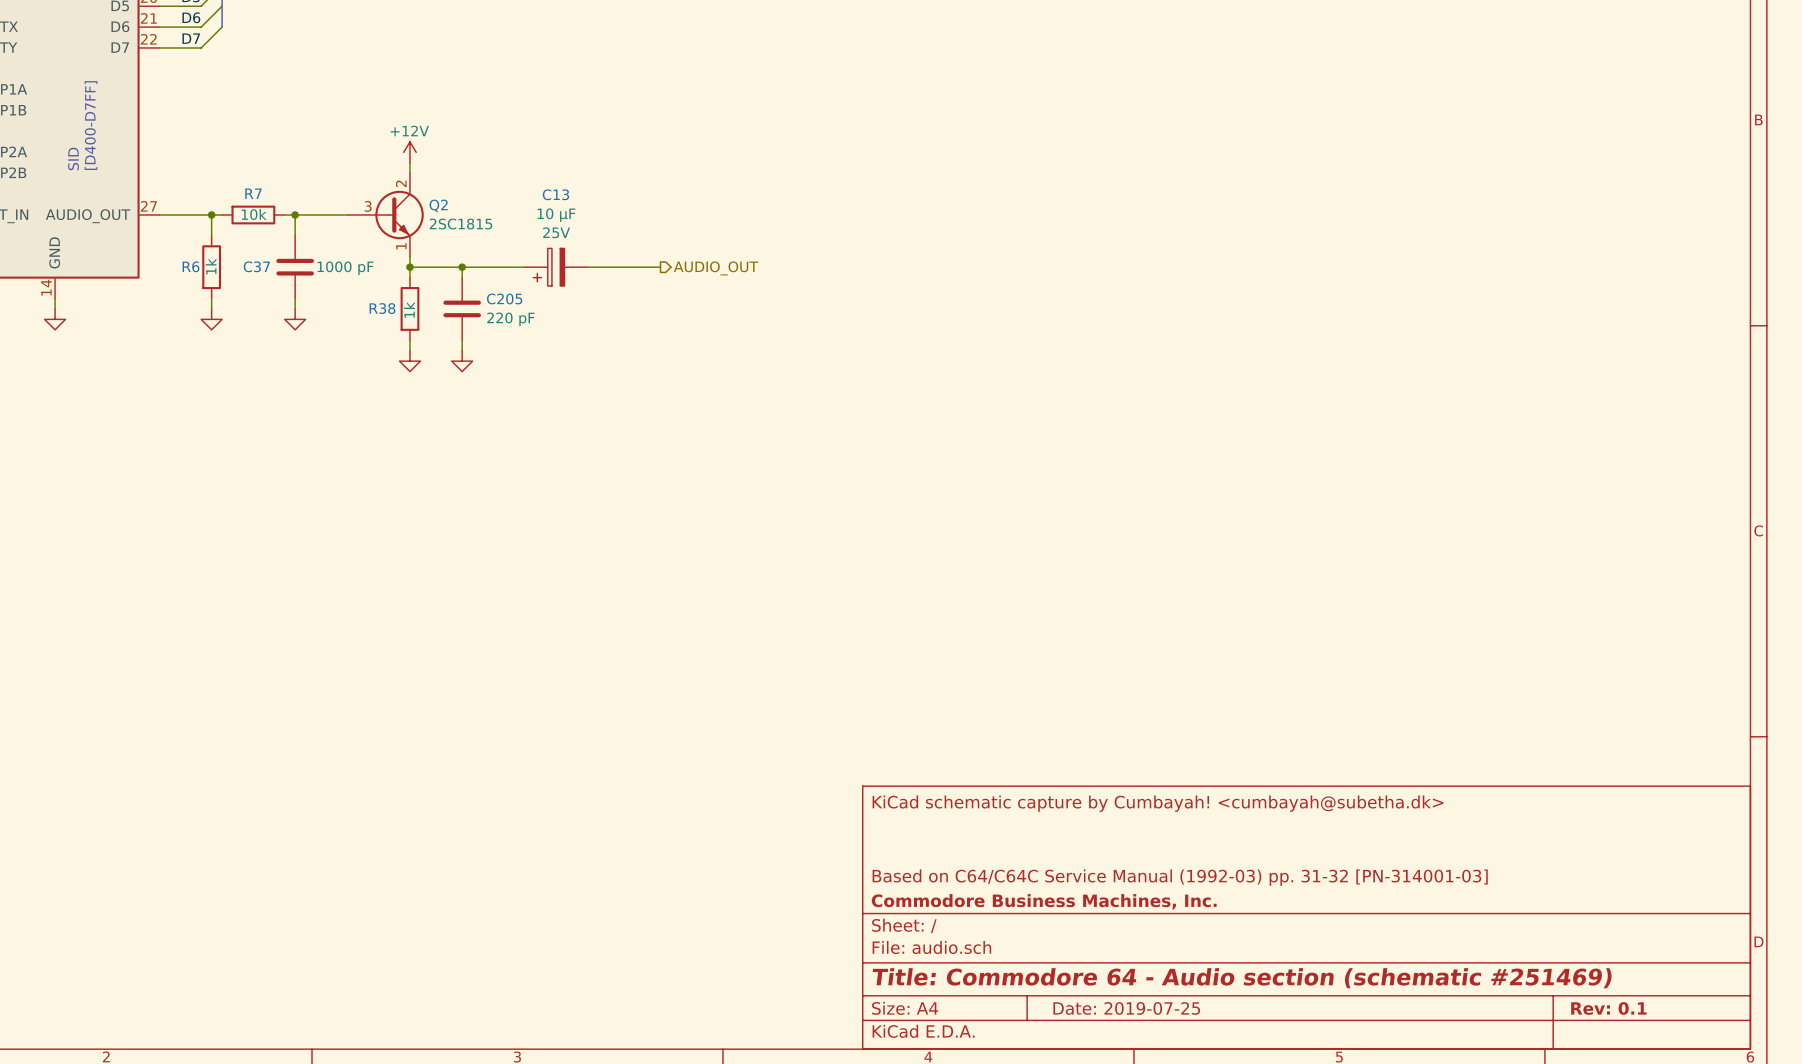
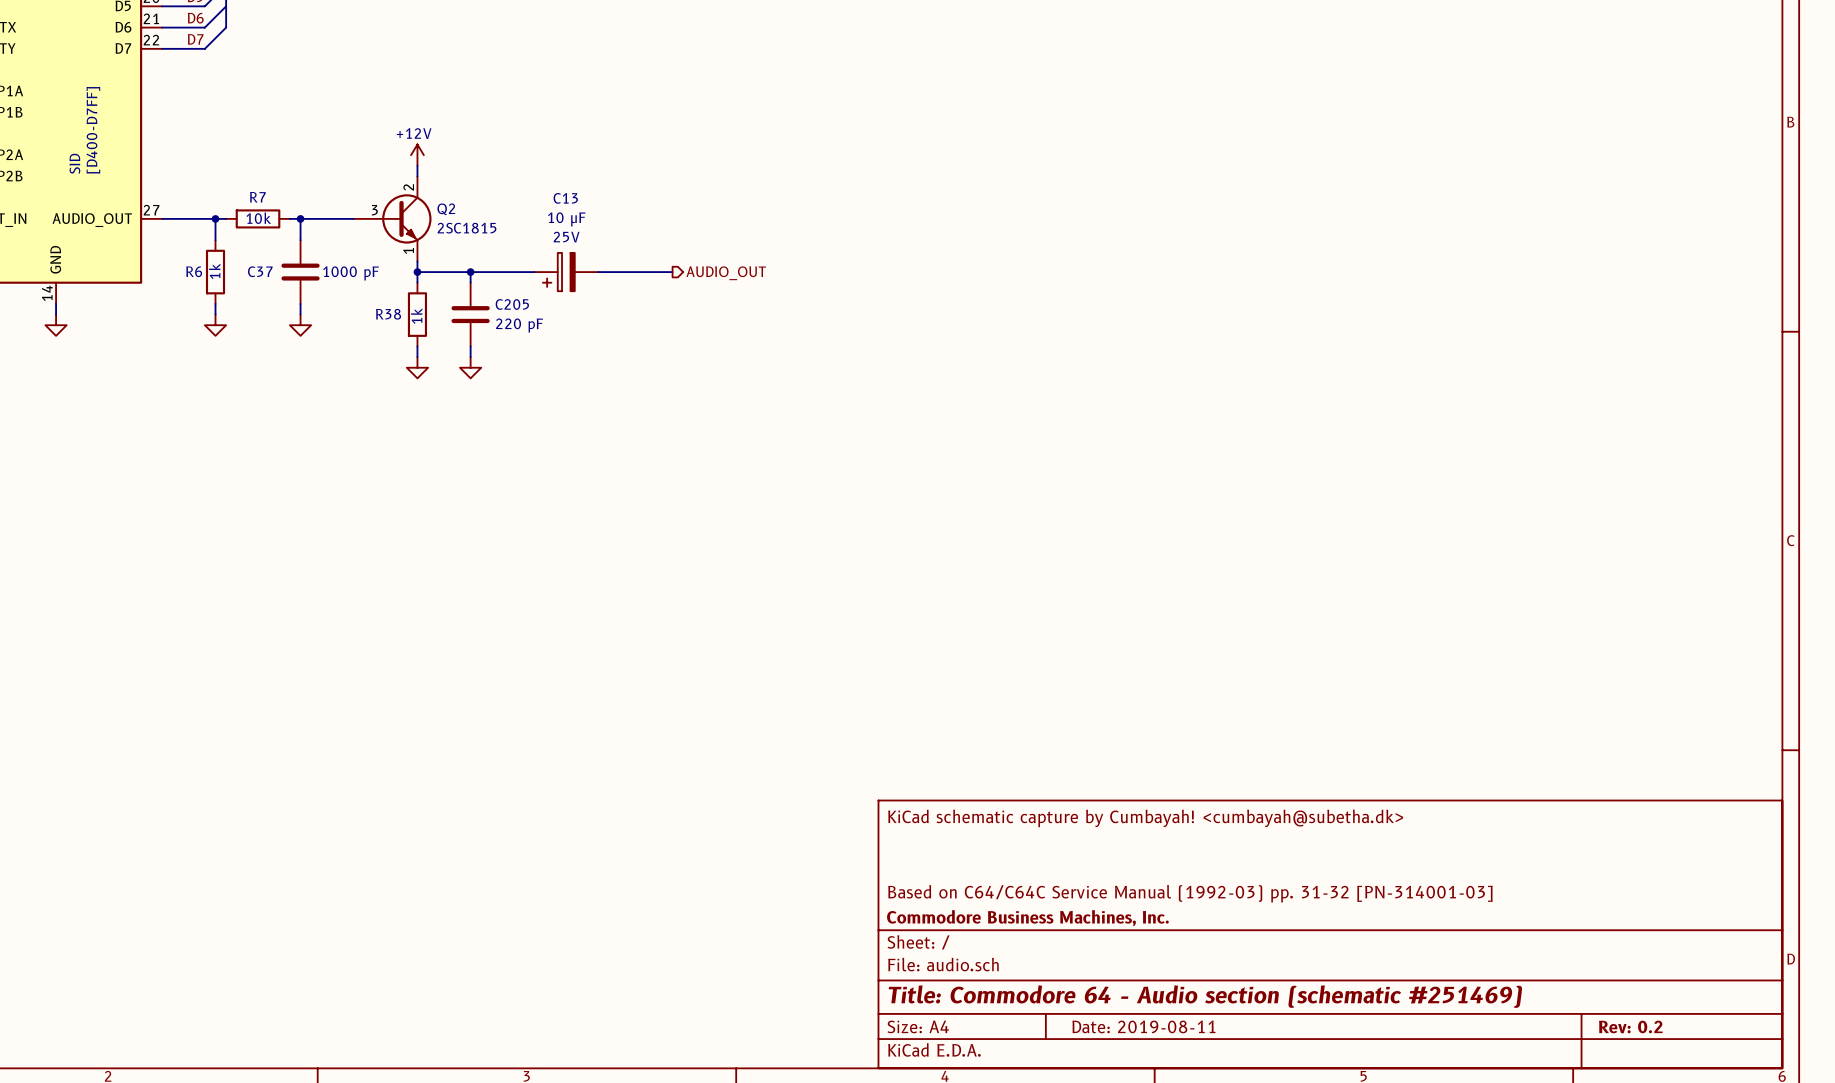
title block: Date: 2019-07-25 (1126, 1008) -> Date: 2019-08-11 (1143, 1026)
title block: Rev: 0.1 (1608, 1008) -> Rev: 0.2 (1630, 1027)

